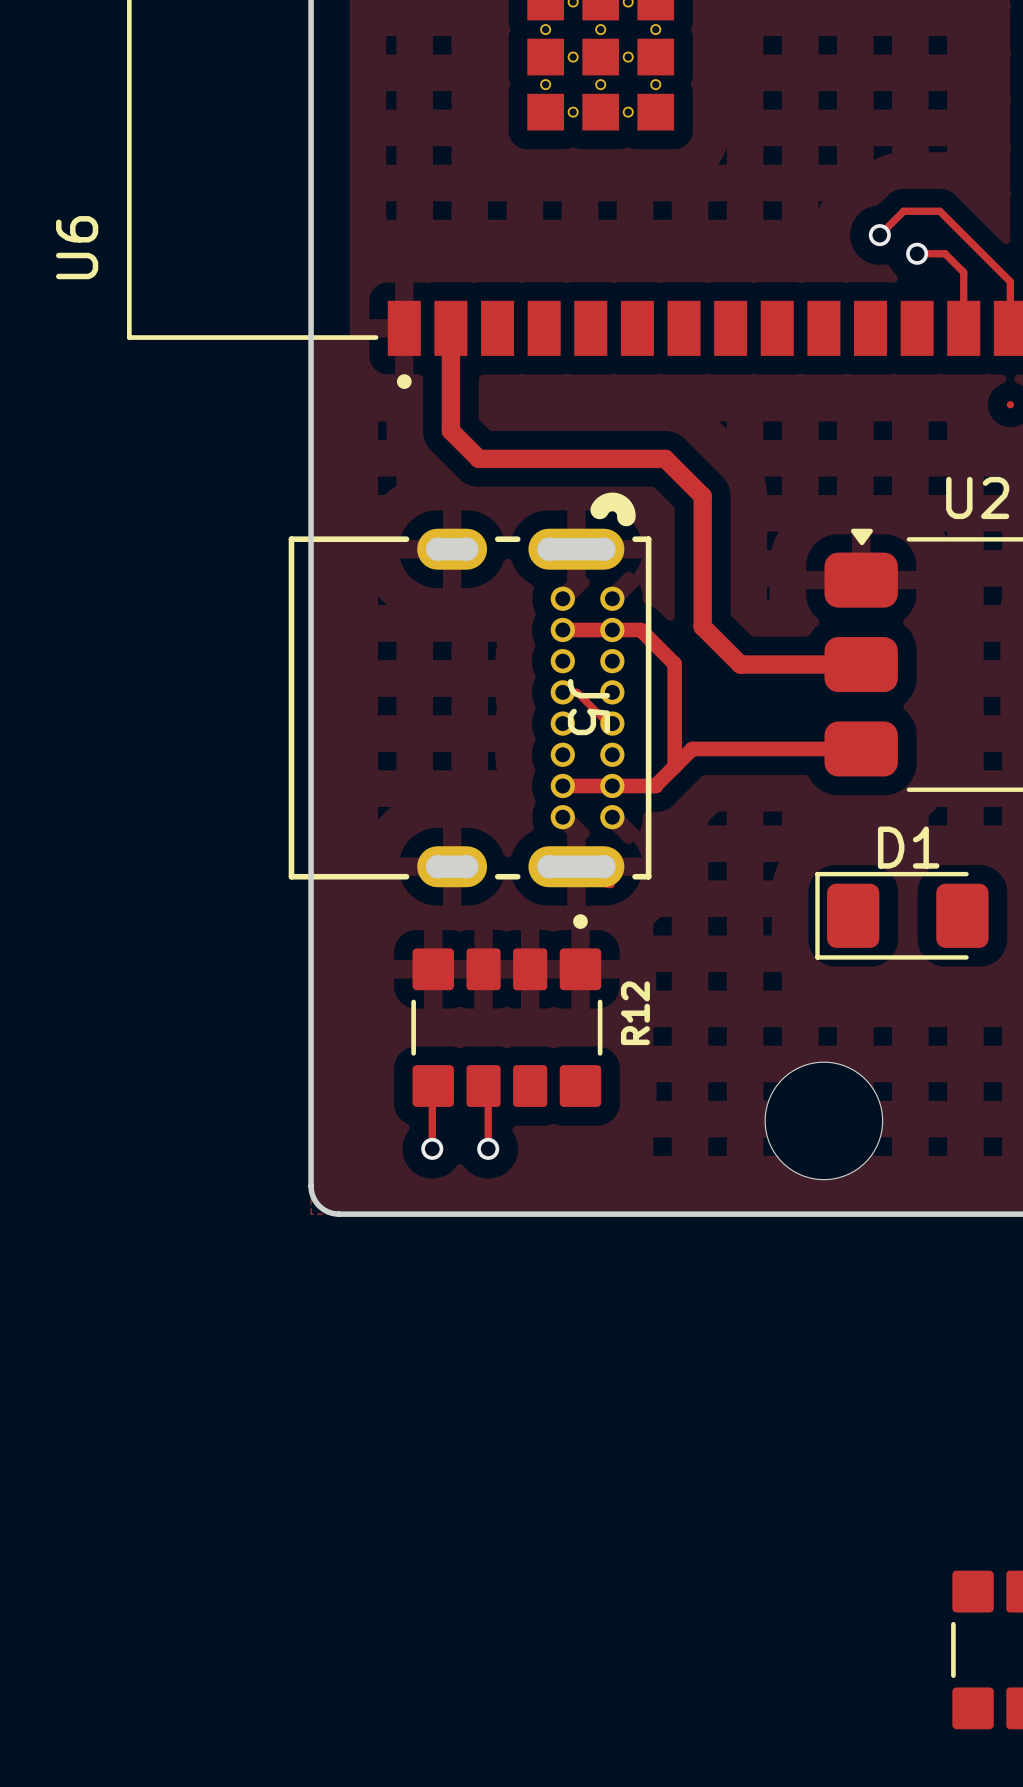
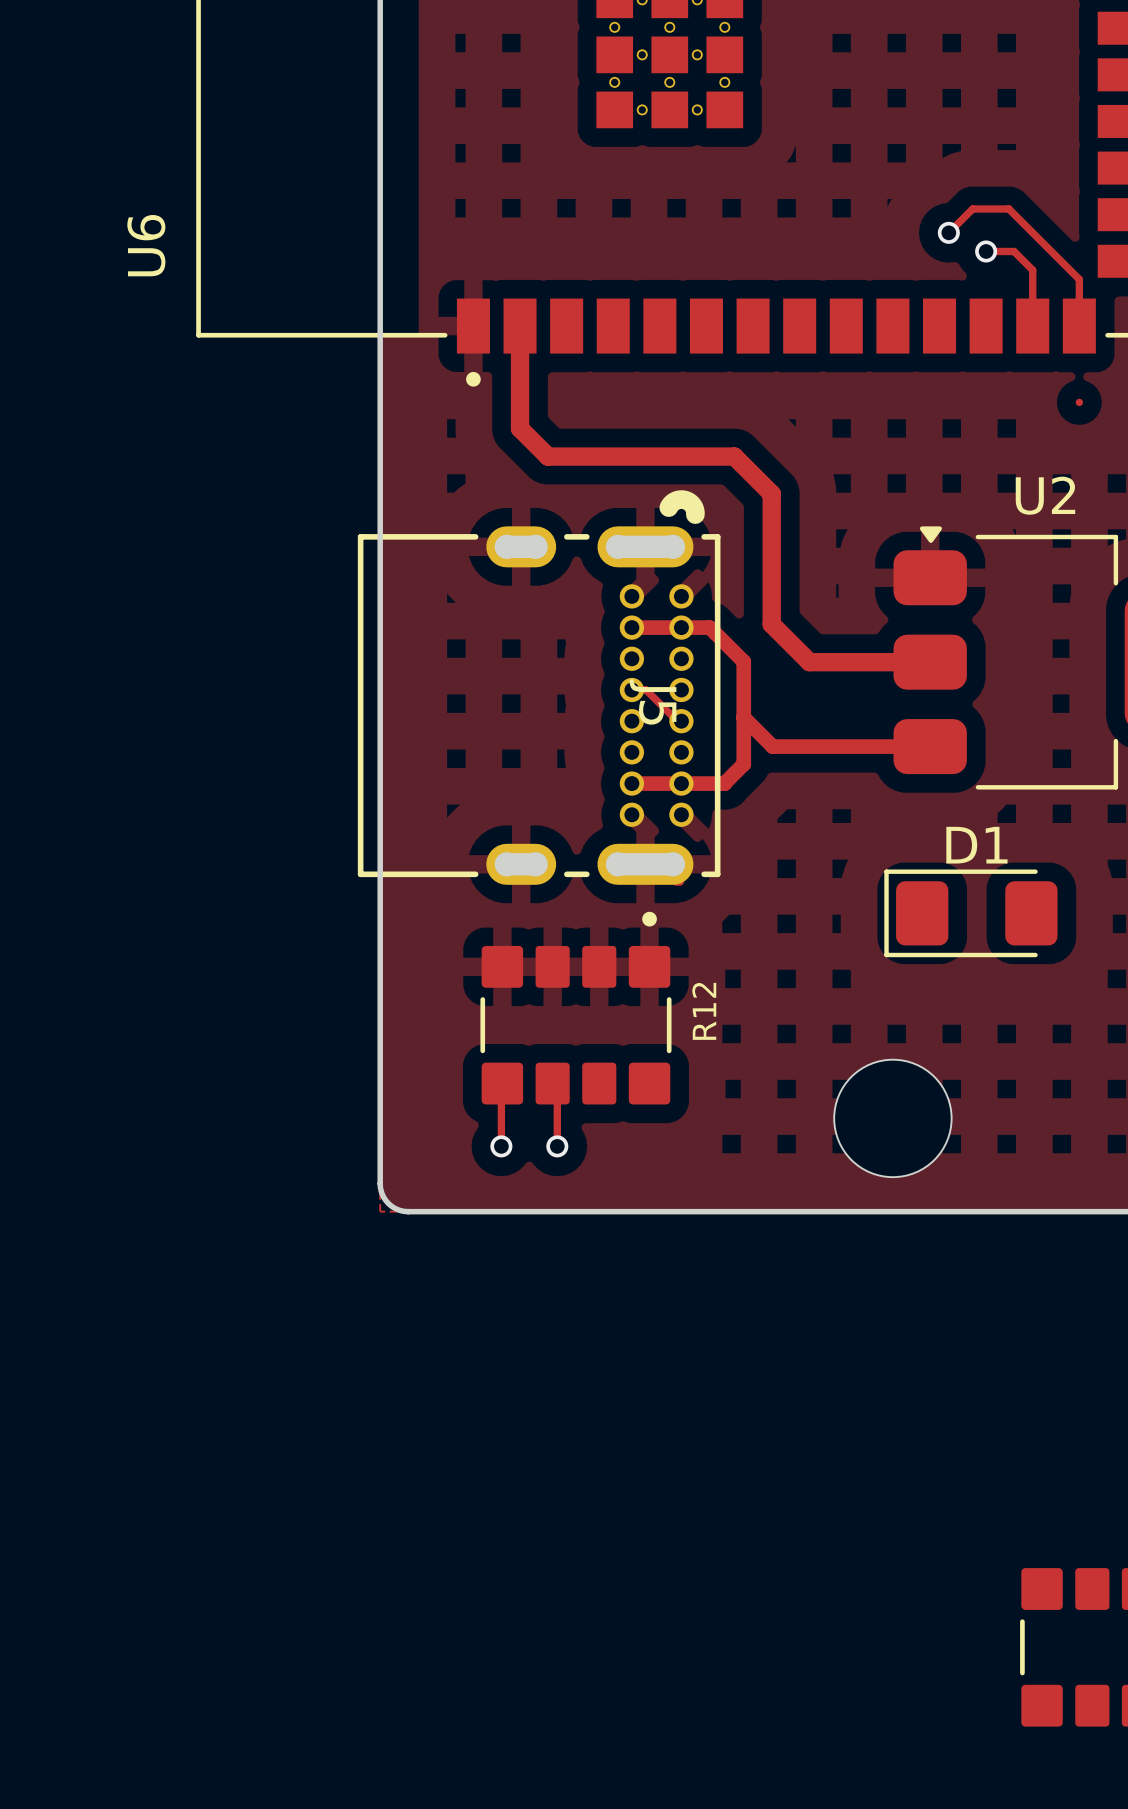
track: (703, 748) (692, 748) (674, 766) -> (772, 746) (743, 717)

